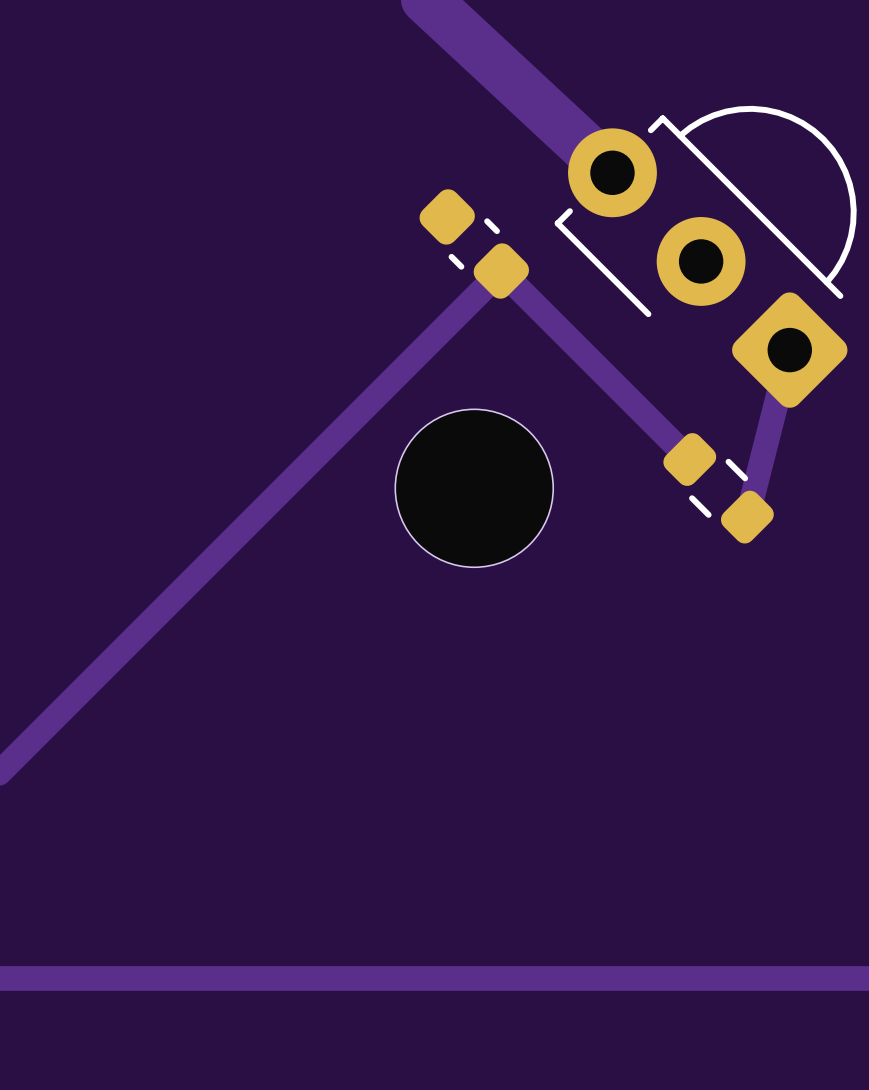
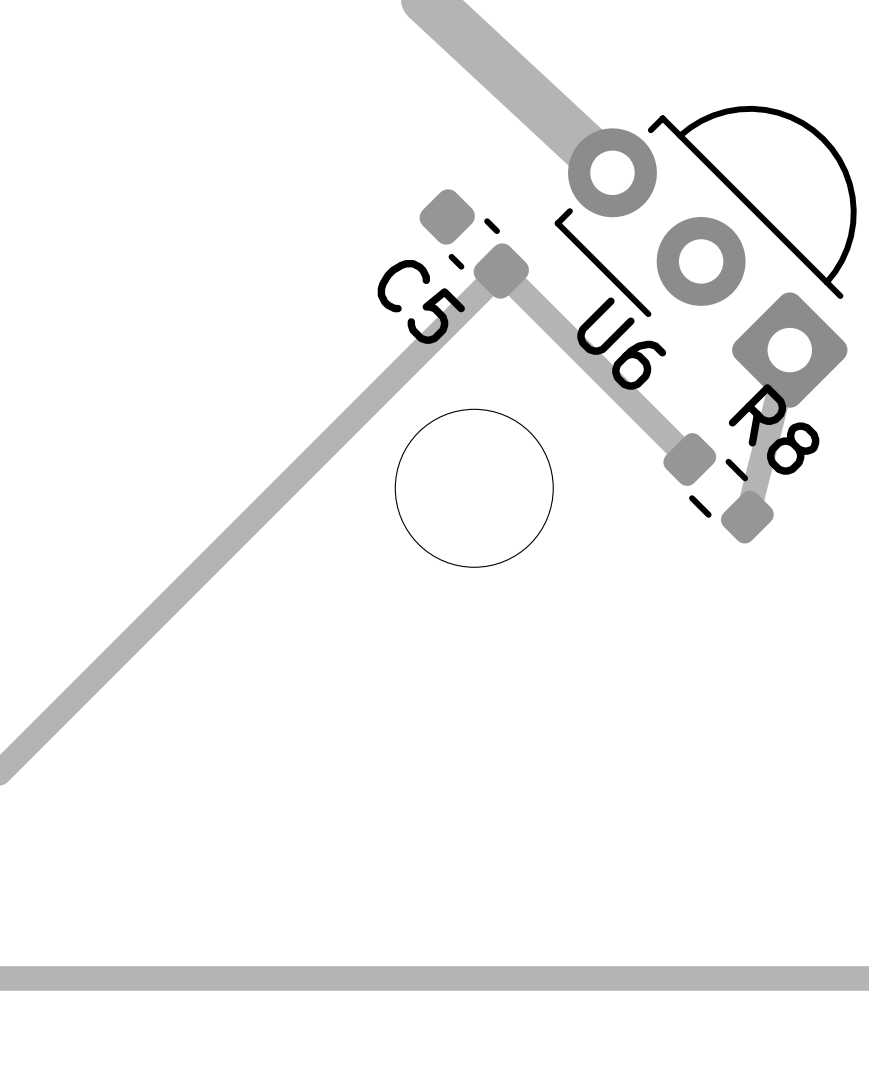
C5 name: none -> C5 (421, 301)
U6 name: none -> U6 (621, 343)
R8 name: none -> R8 (774, 429)

